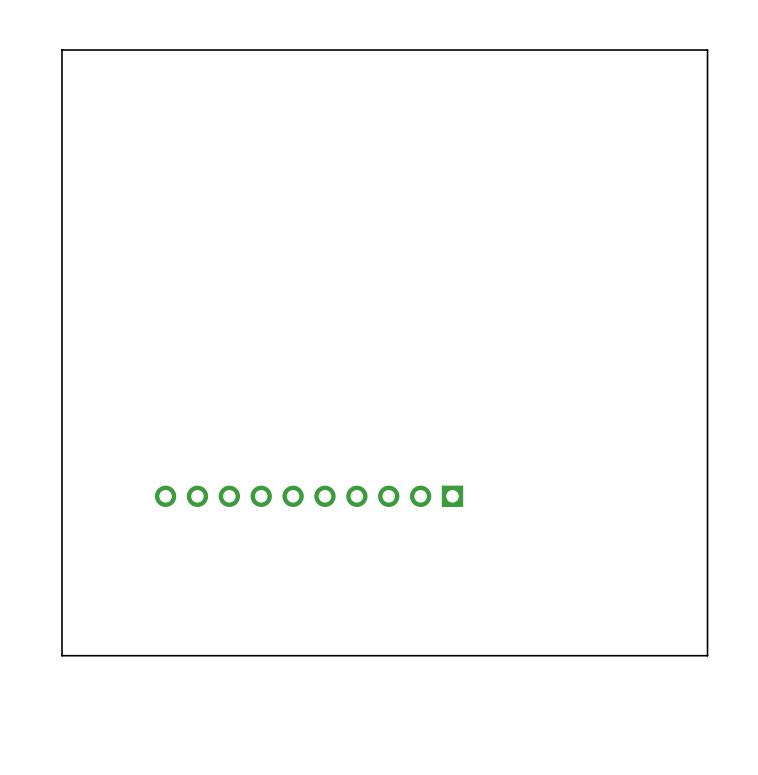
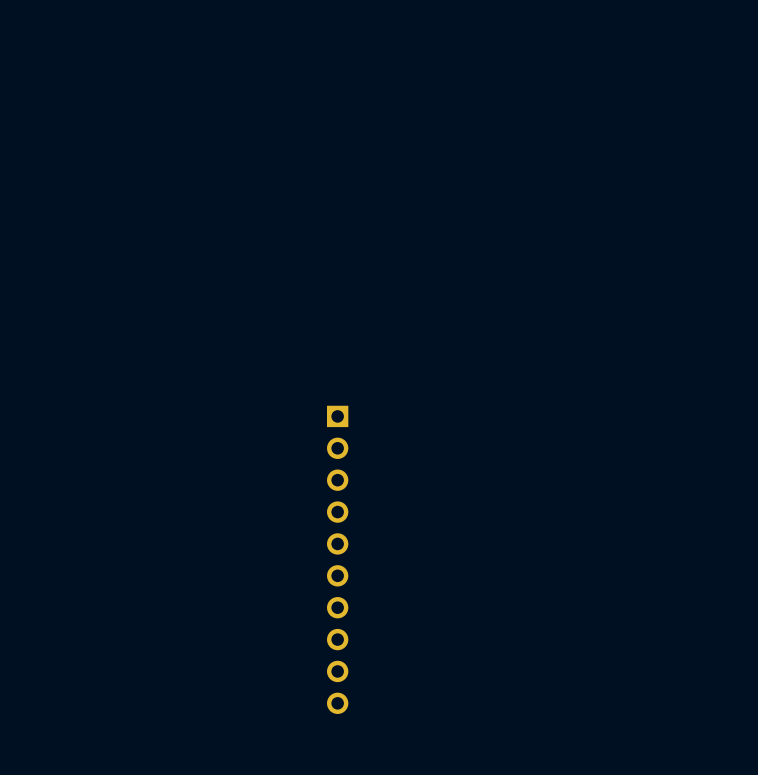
board edge: (707, 50) (61, 50) (61, 655) (707, 655) (707, 50) -> none
part rotation: 0° (309, 496) -> 90° counterclockwise (337, 559)

